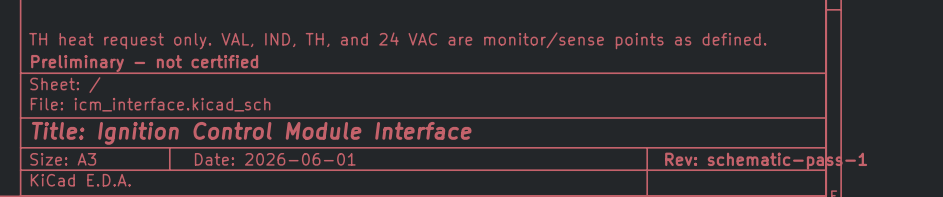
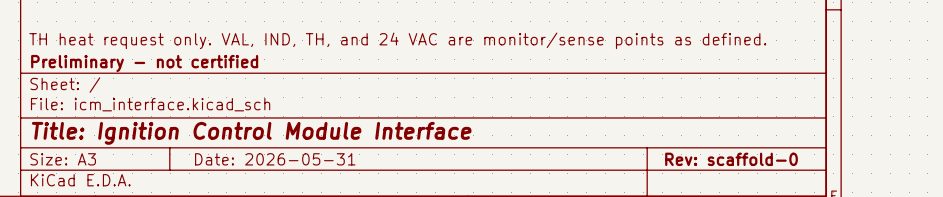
title block: Date: 2026-06-01 (275, 159) -> Date: 2026-05-31 (275, 159)
title block: Rev: schematic-pass-1 (766, 161) -> Rev: scaffold-0 (731, 159)

